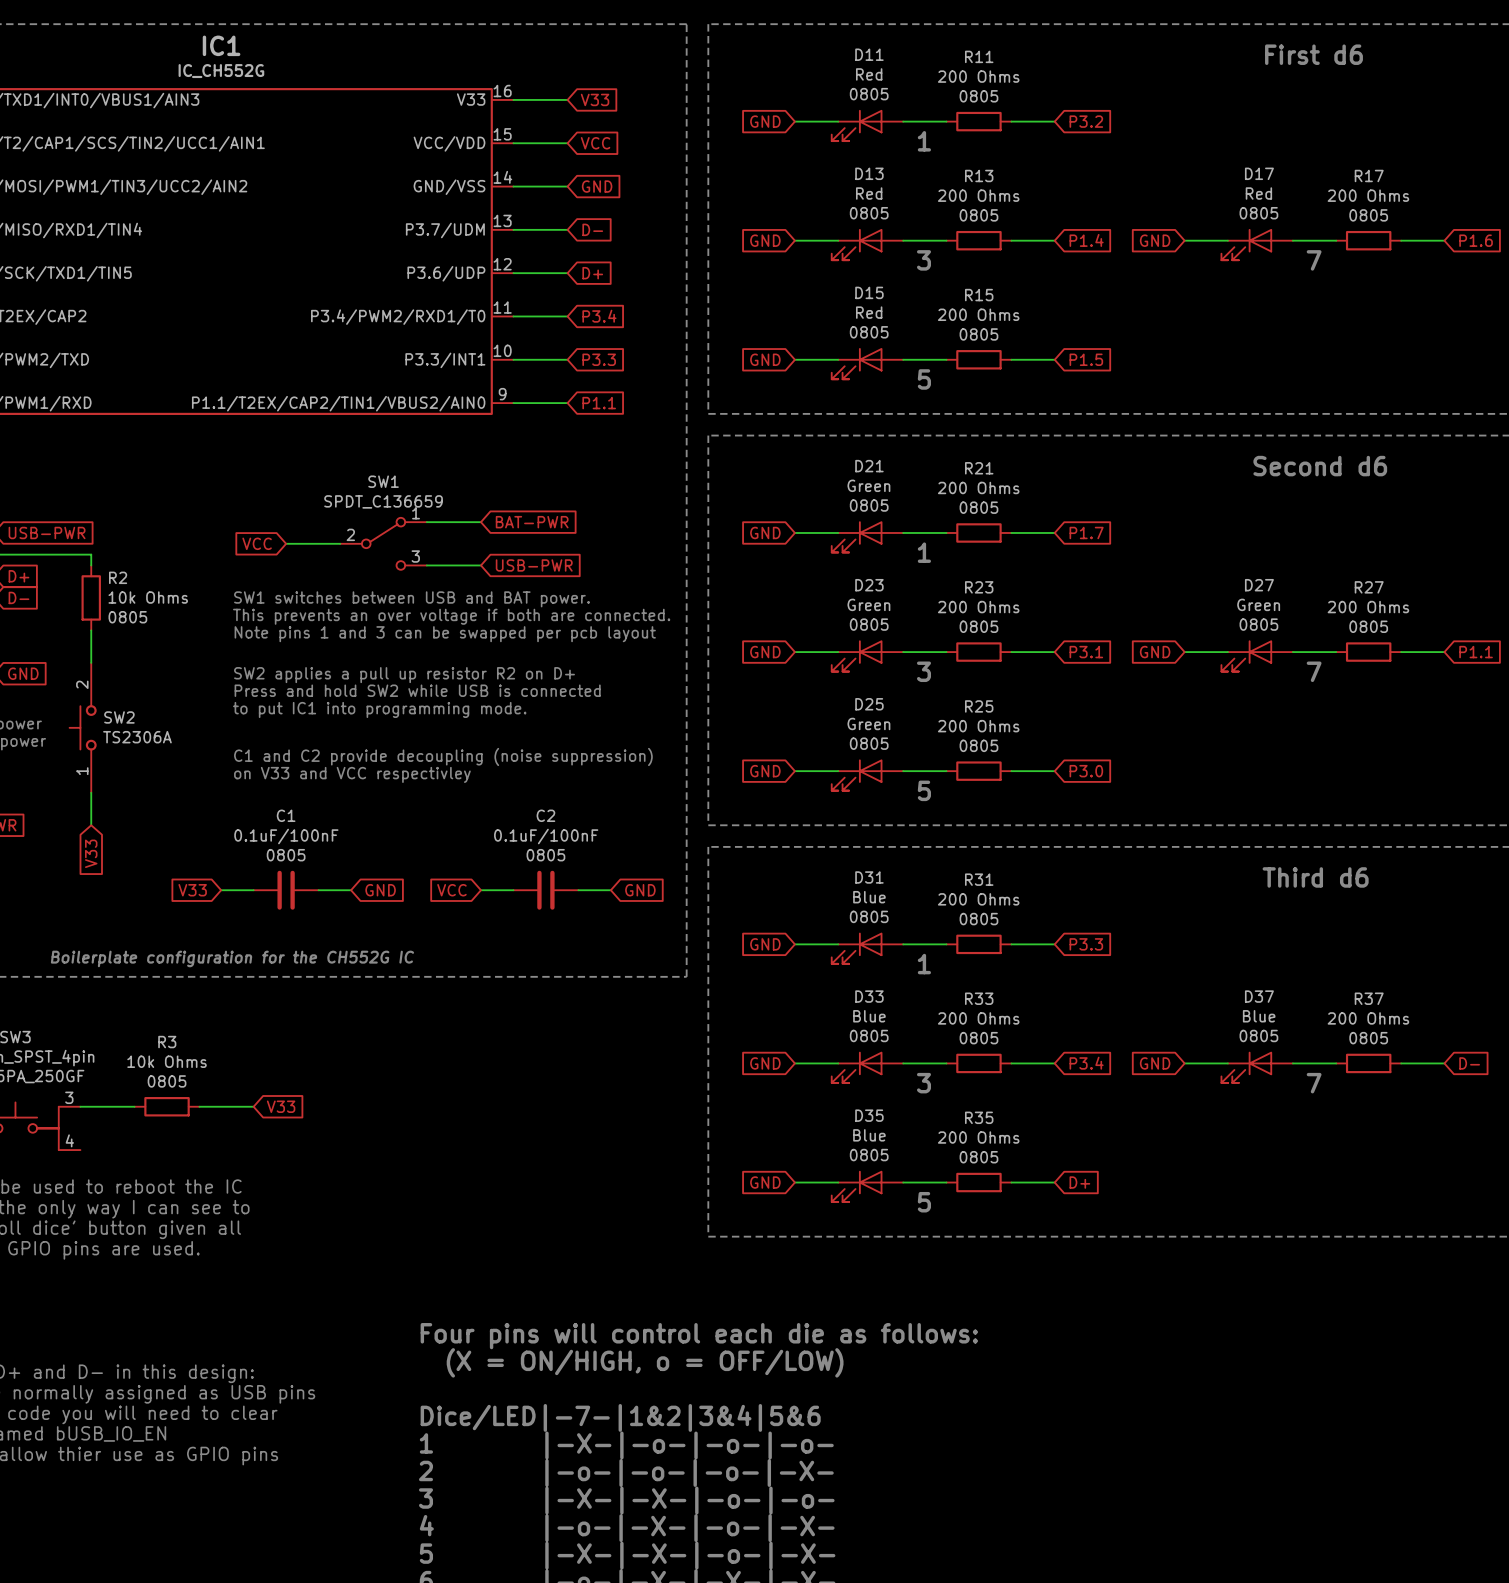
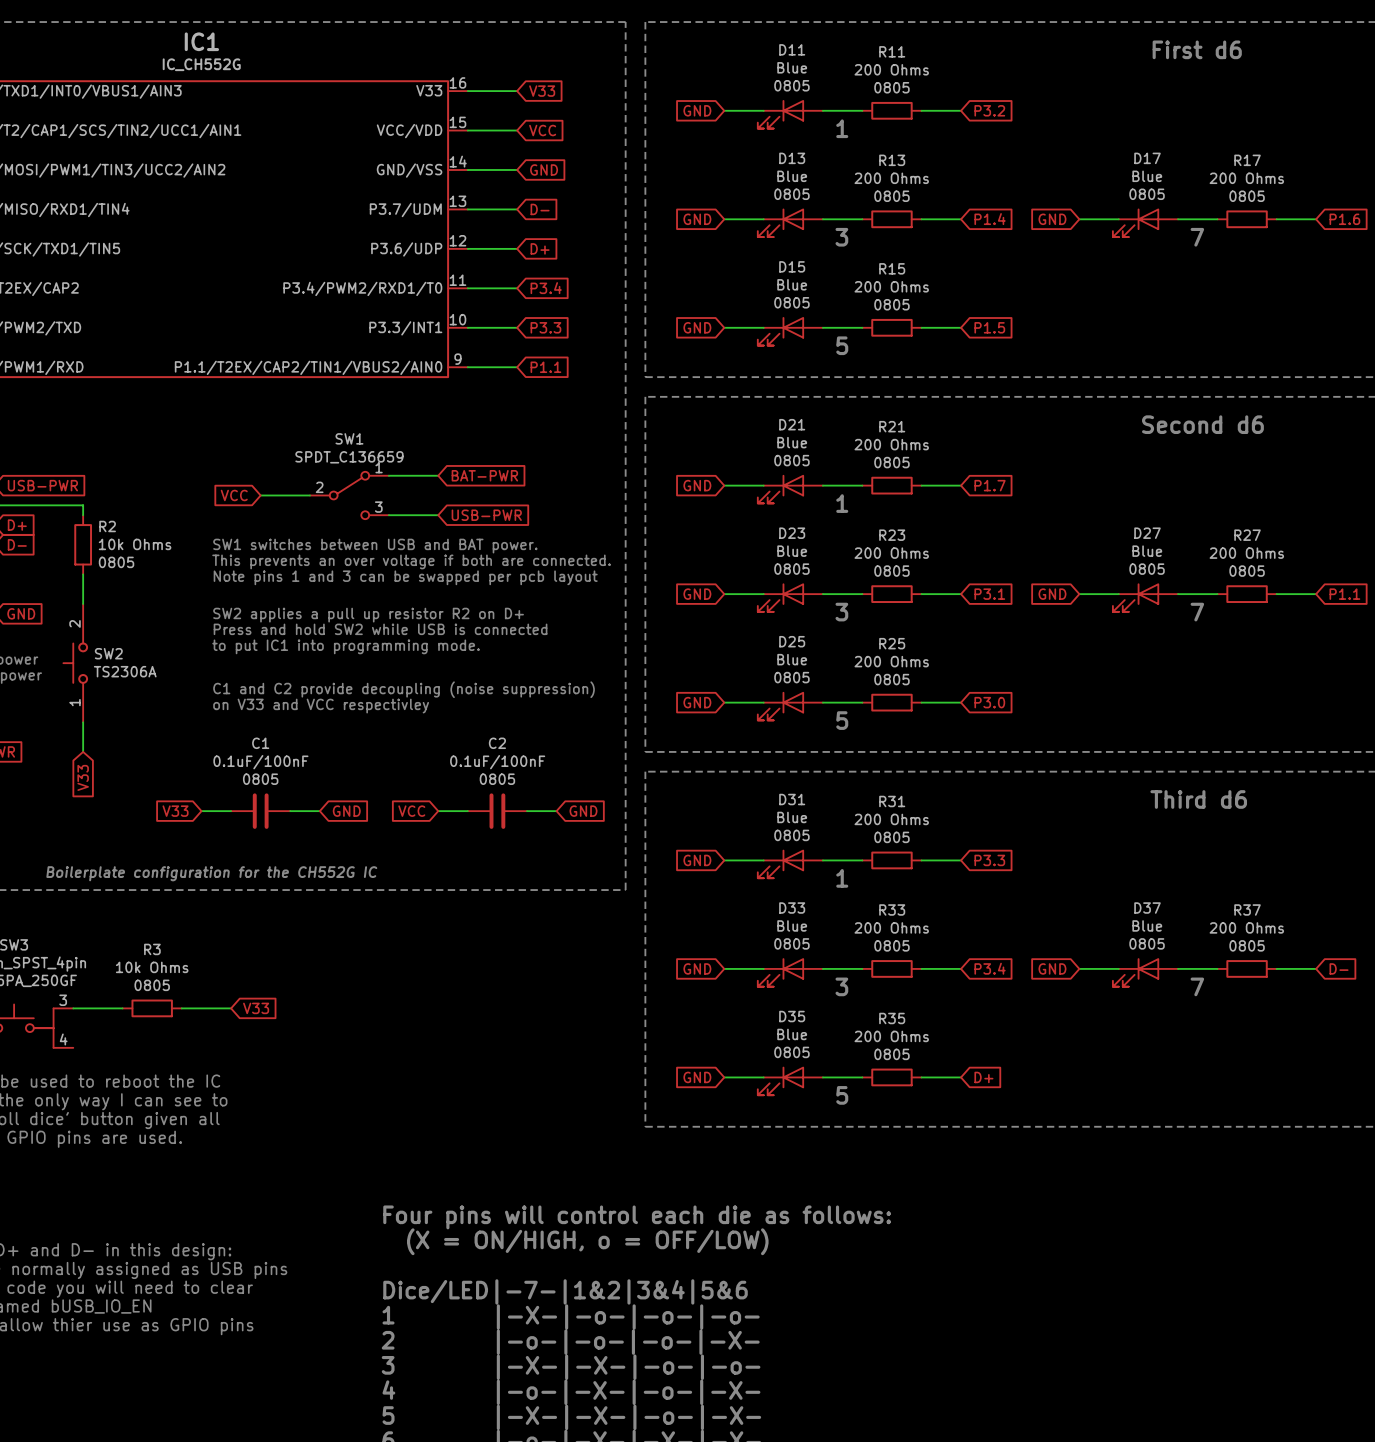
D11 value: Red (869, 74) -> Blue (792, 67)
D13 value: Red (869, 193) -> Blue (792, 176)
D17 value: Red (1258, 193) -> Blue (1147, 176)
D15 value: Red (869, 312) -> Blue (792, 284)
D21 value: Green (868, 485) -> Blue (792, 442)
D23 value: Green (868, 604) -> Blue (792, 551)
D27 value: Green (1258, 604) -> Blue (1147, 551)
D25 value: Green (868, 723) -> Blue (792, 659)

